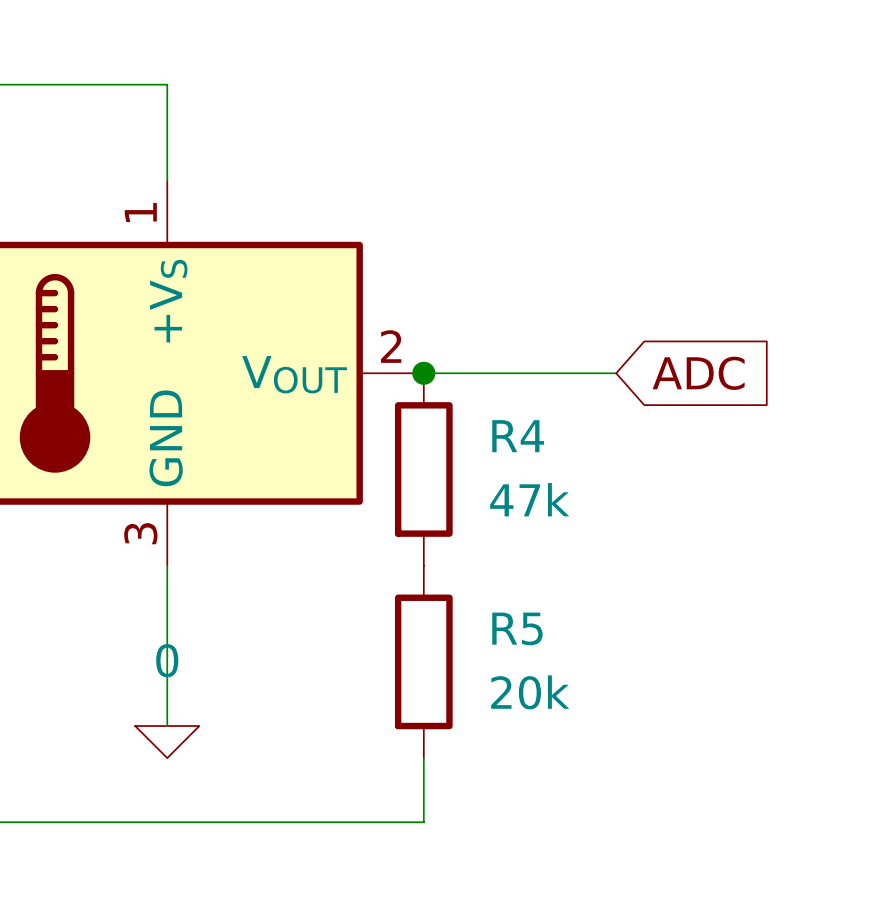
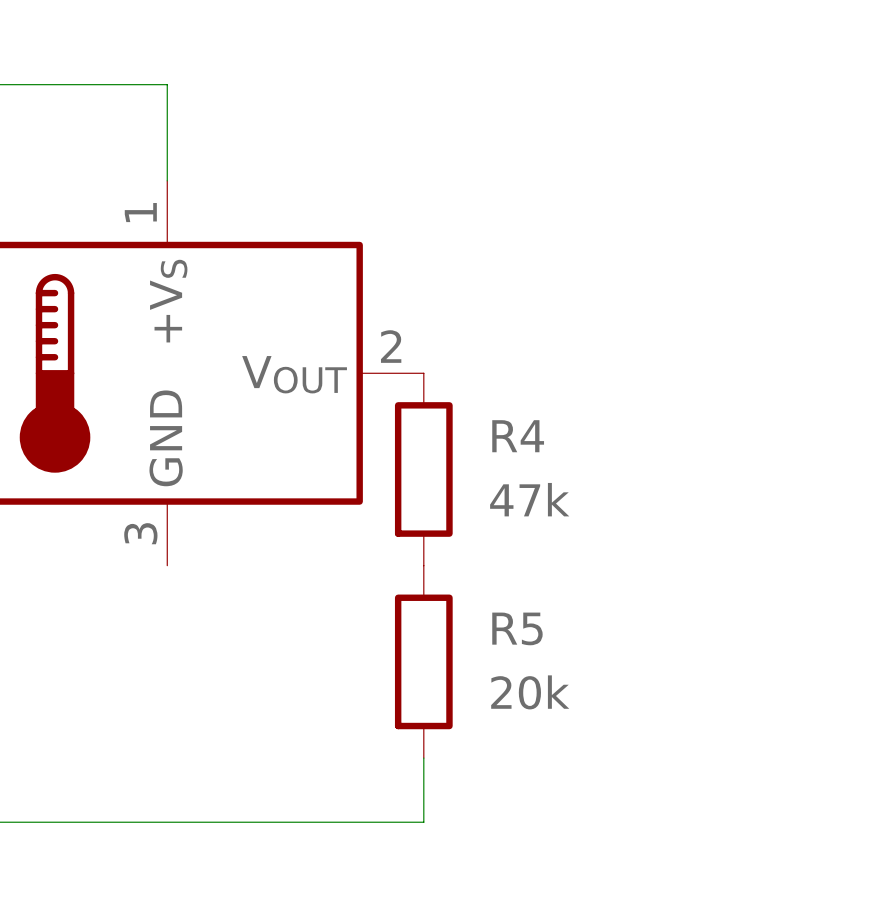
wire: (423, 373) (616, 373) -> none
junction: (423, 373) -> none
global label: ADC (698, 373) -> none
wire: (167, 565) (167, 726) -> none
power symbol: 0 (167, 742) -> none

